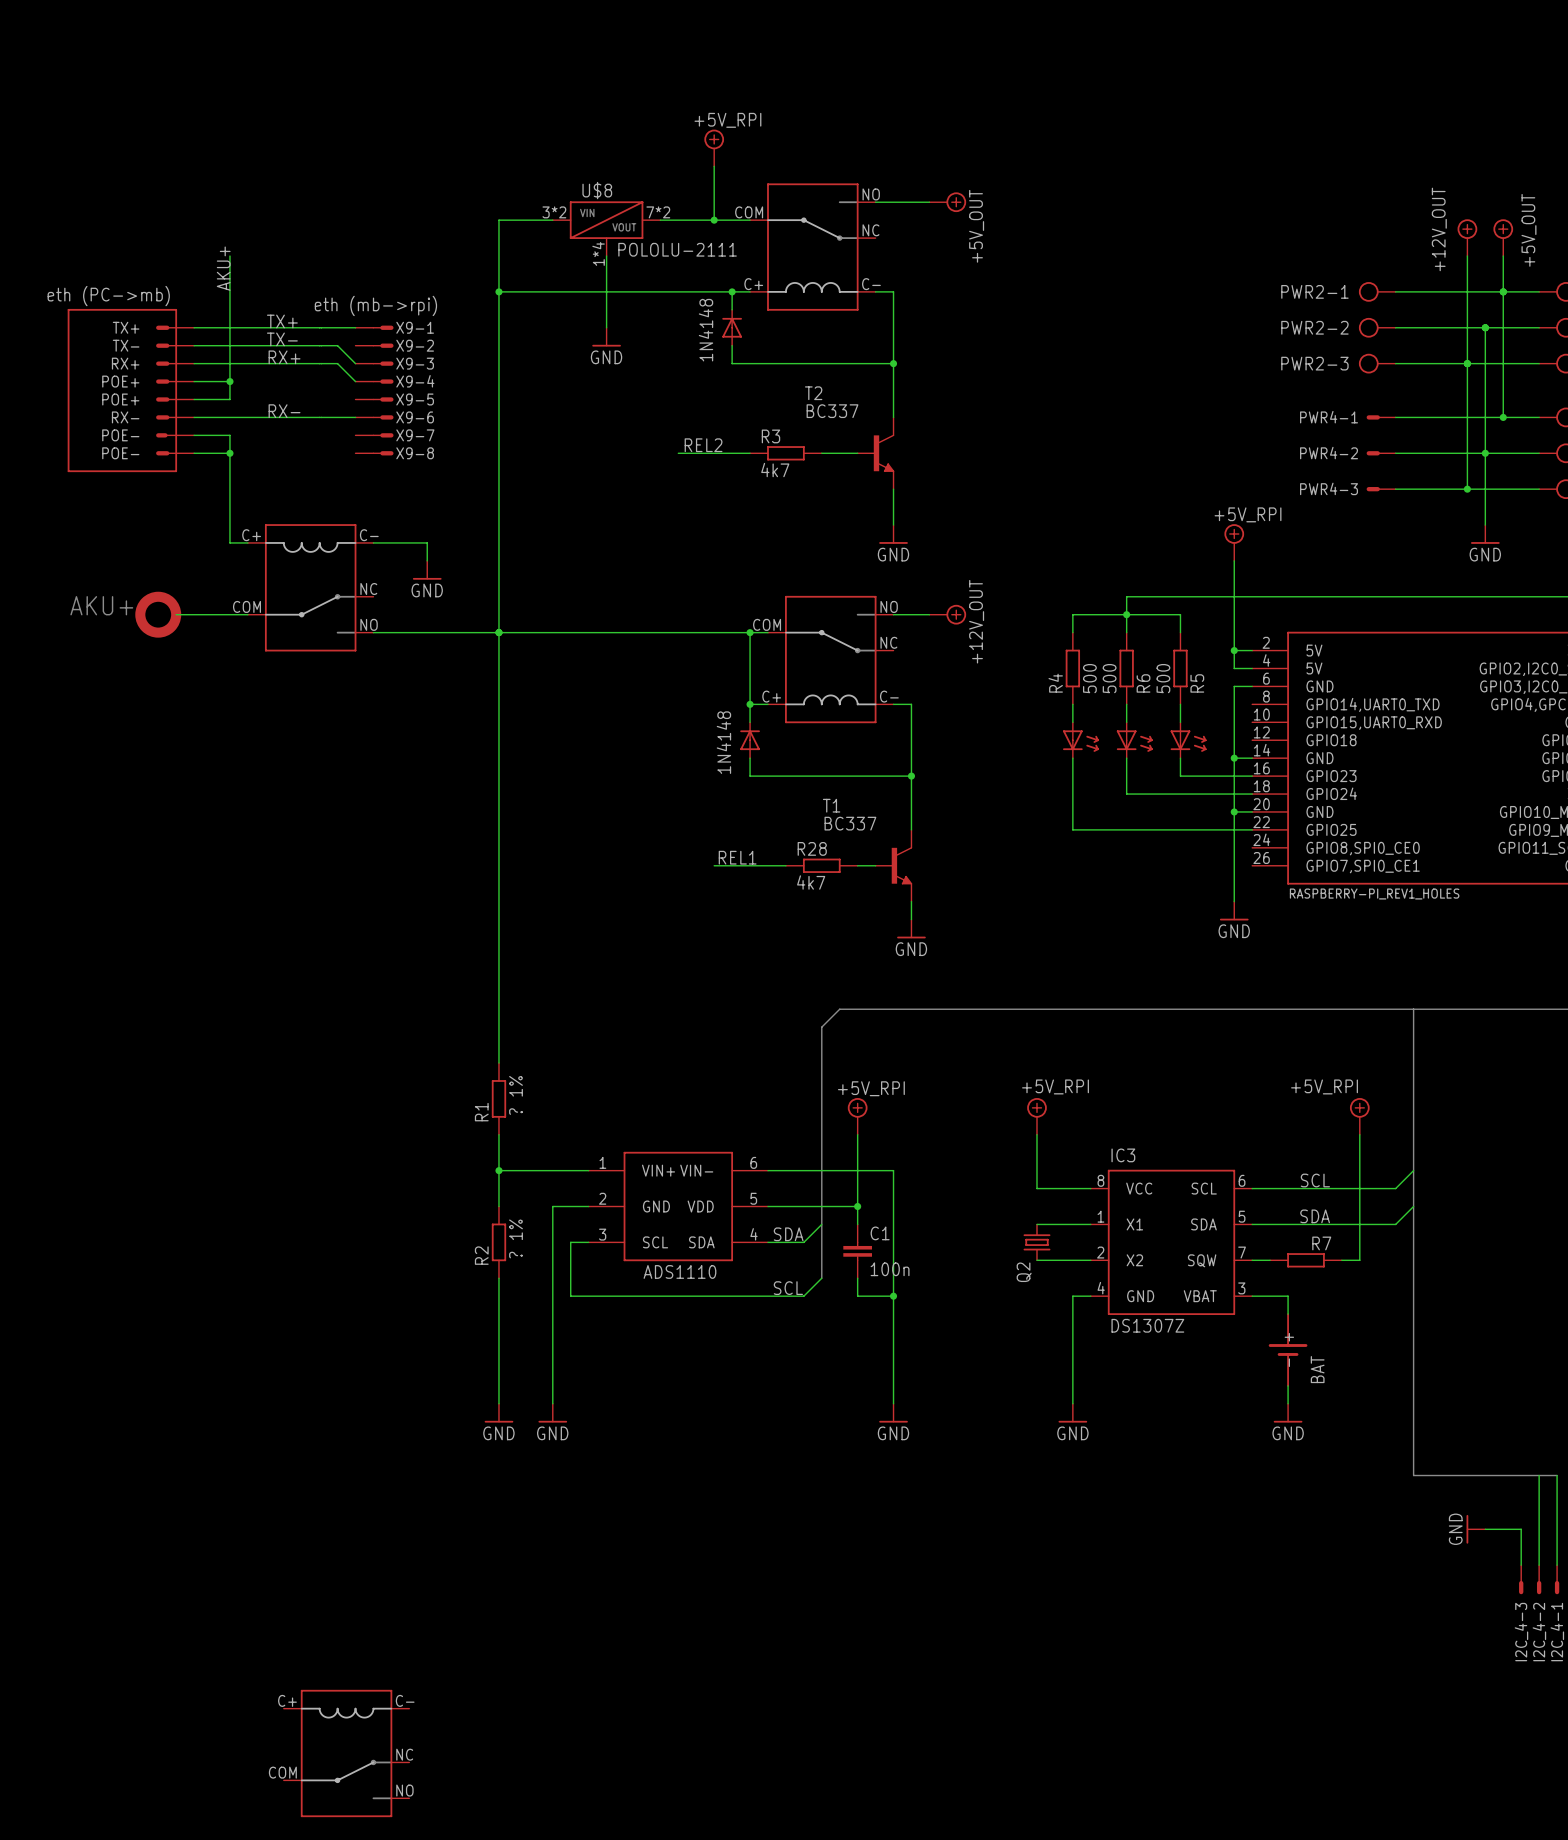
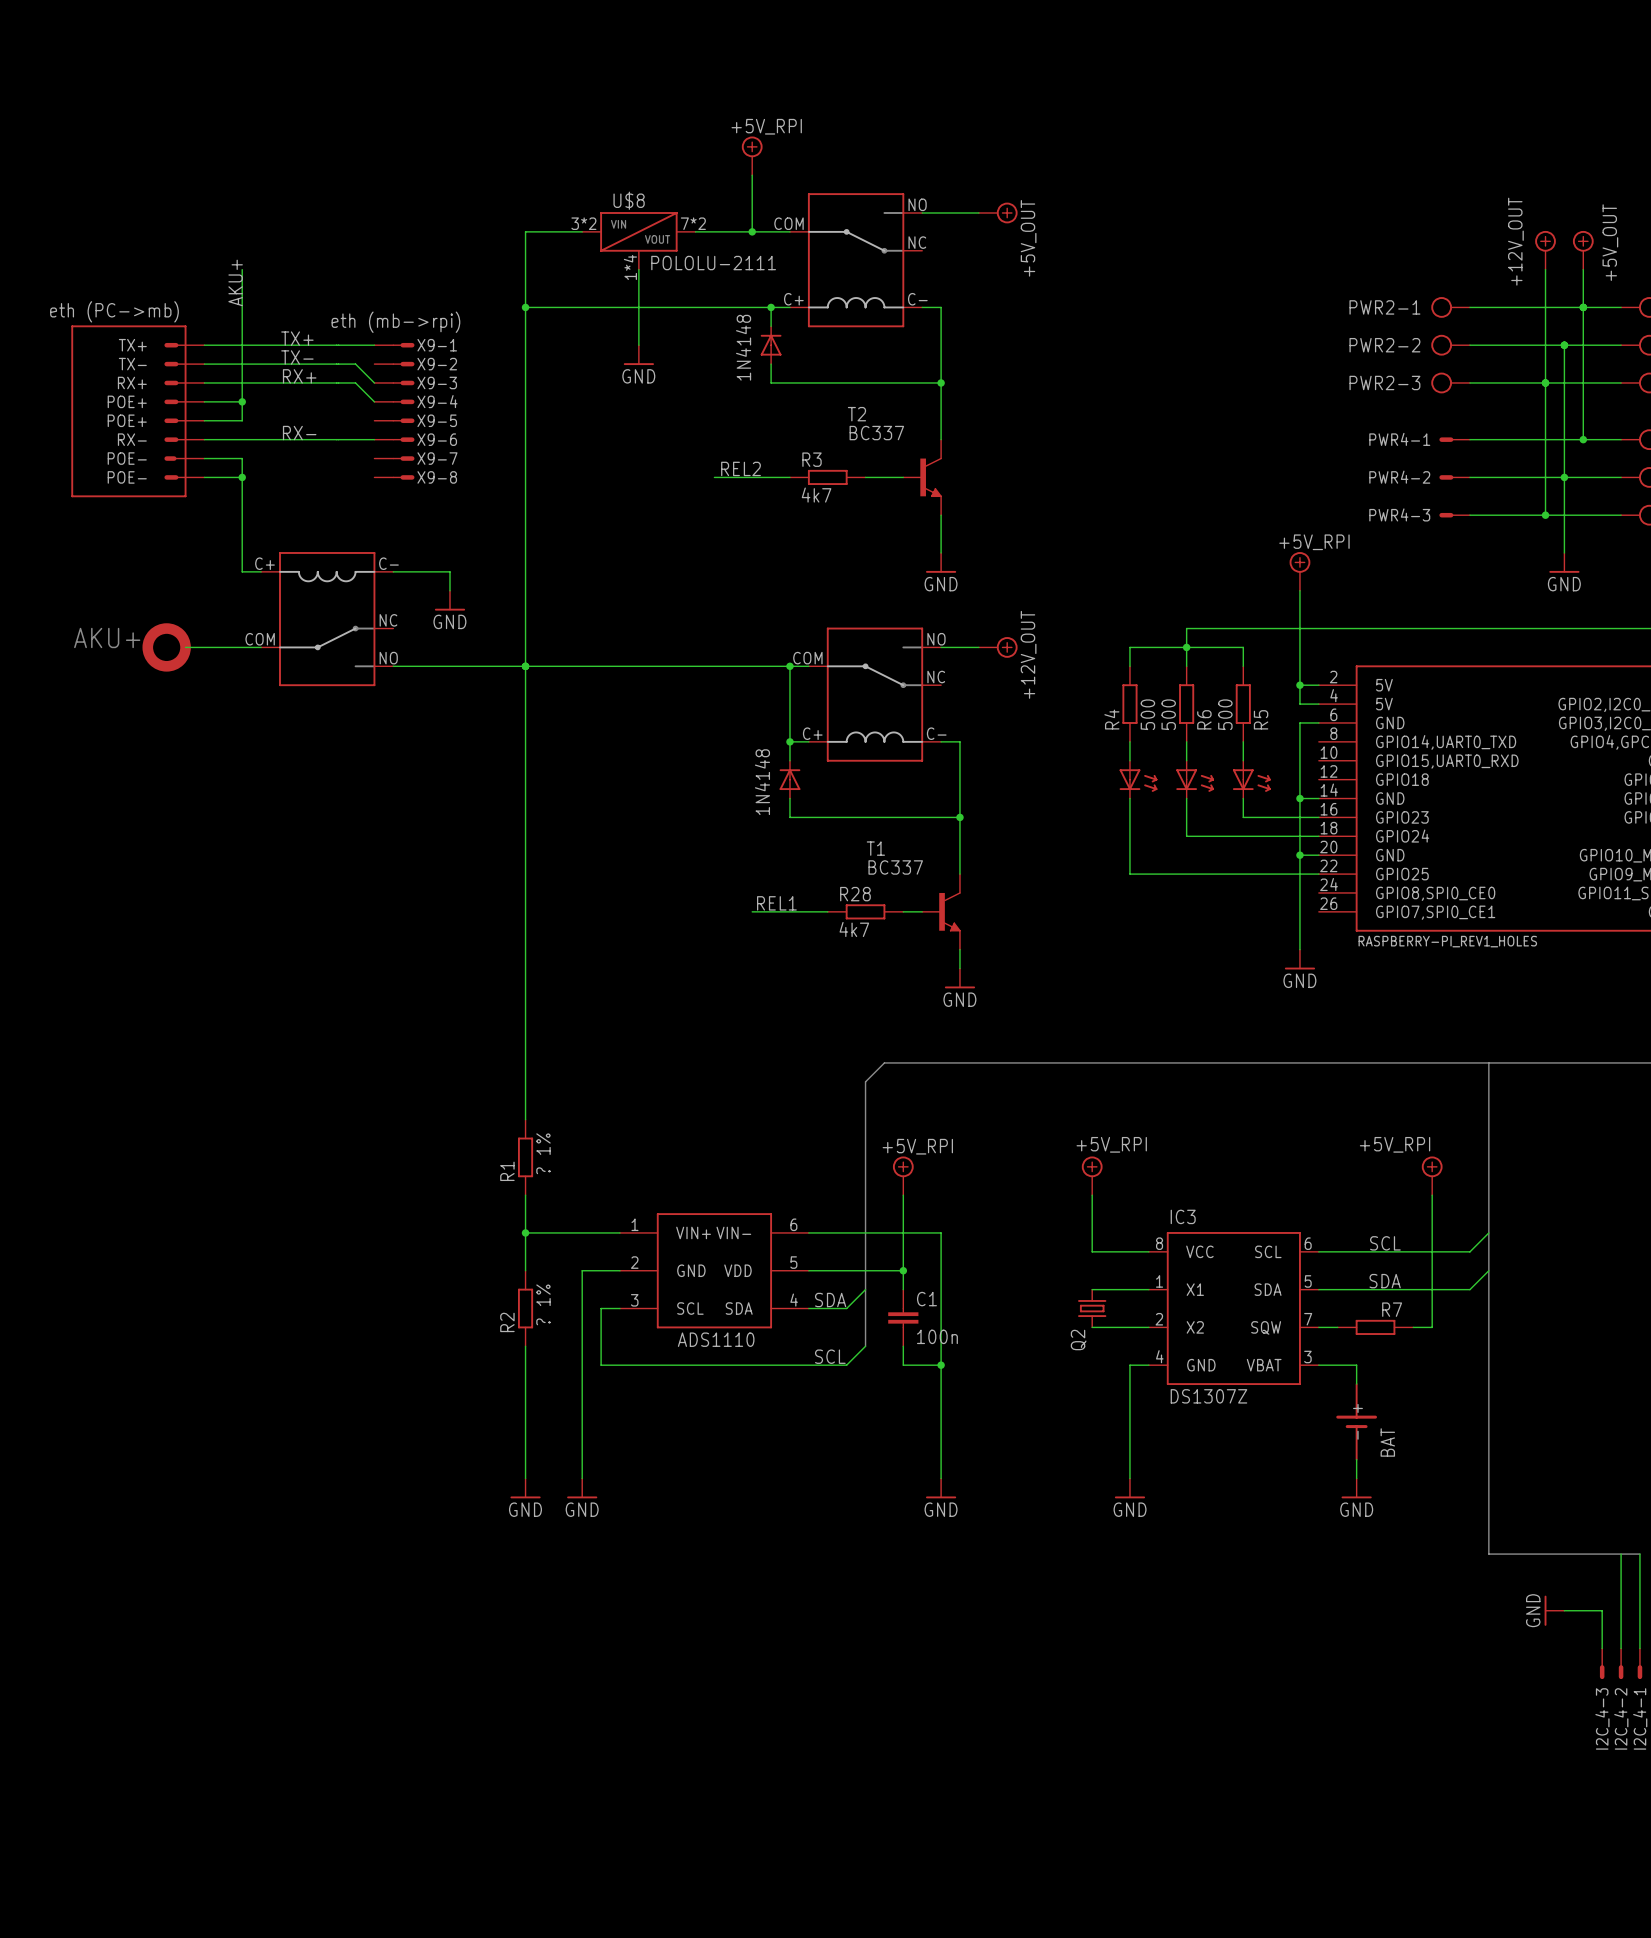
part: (346, 1753) -> none

